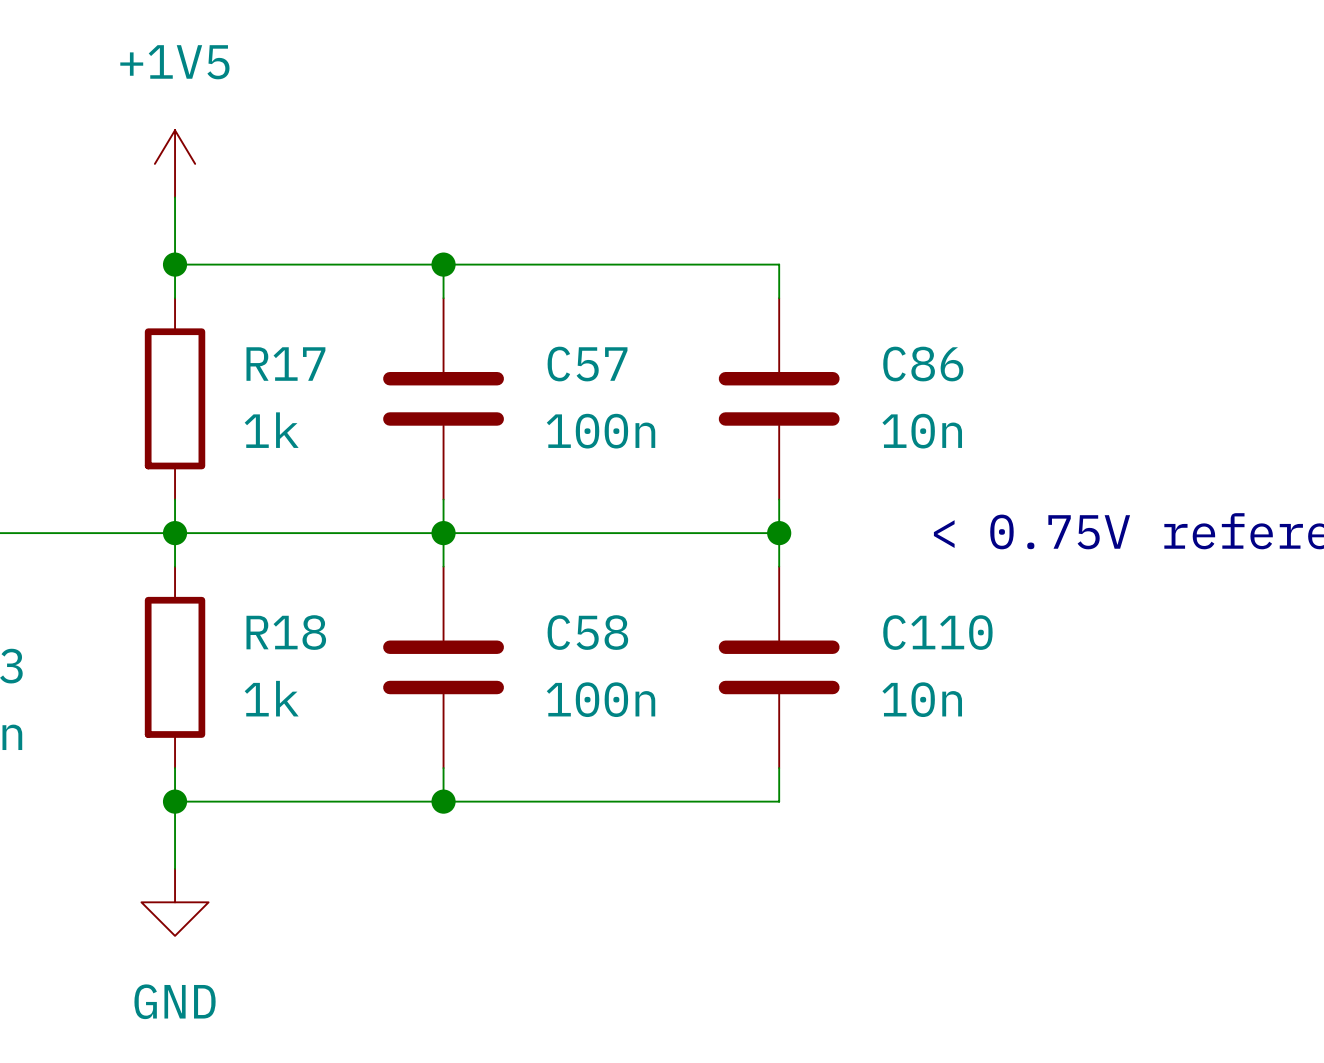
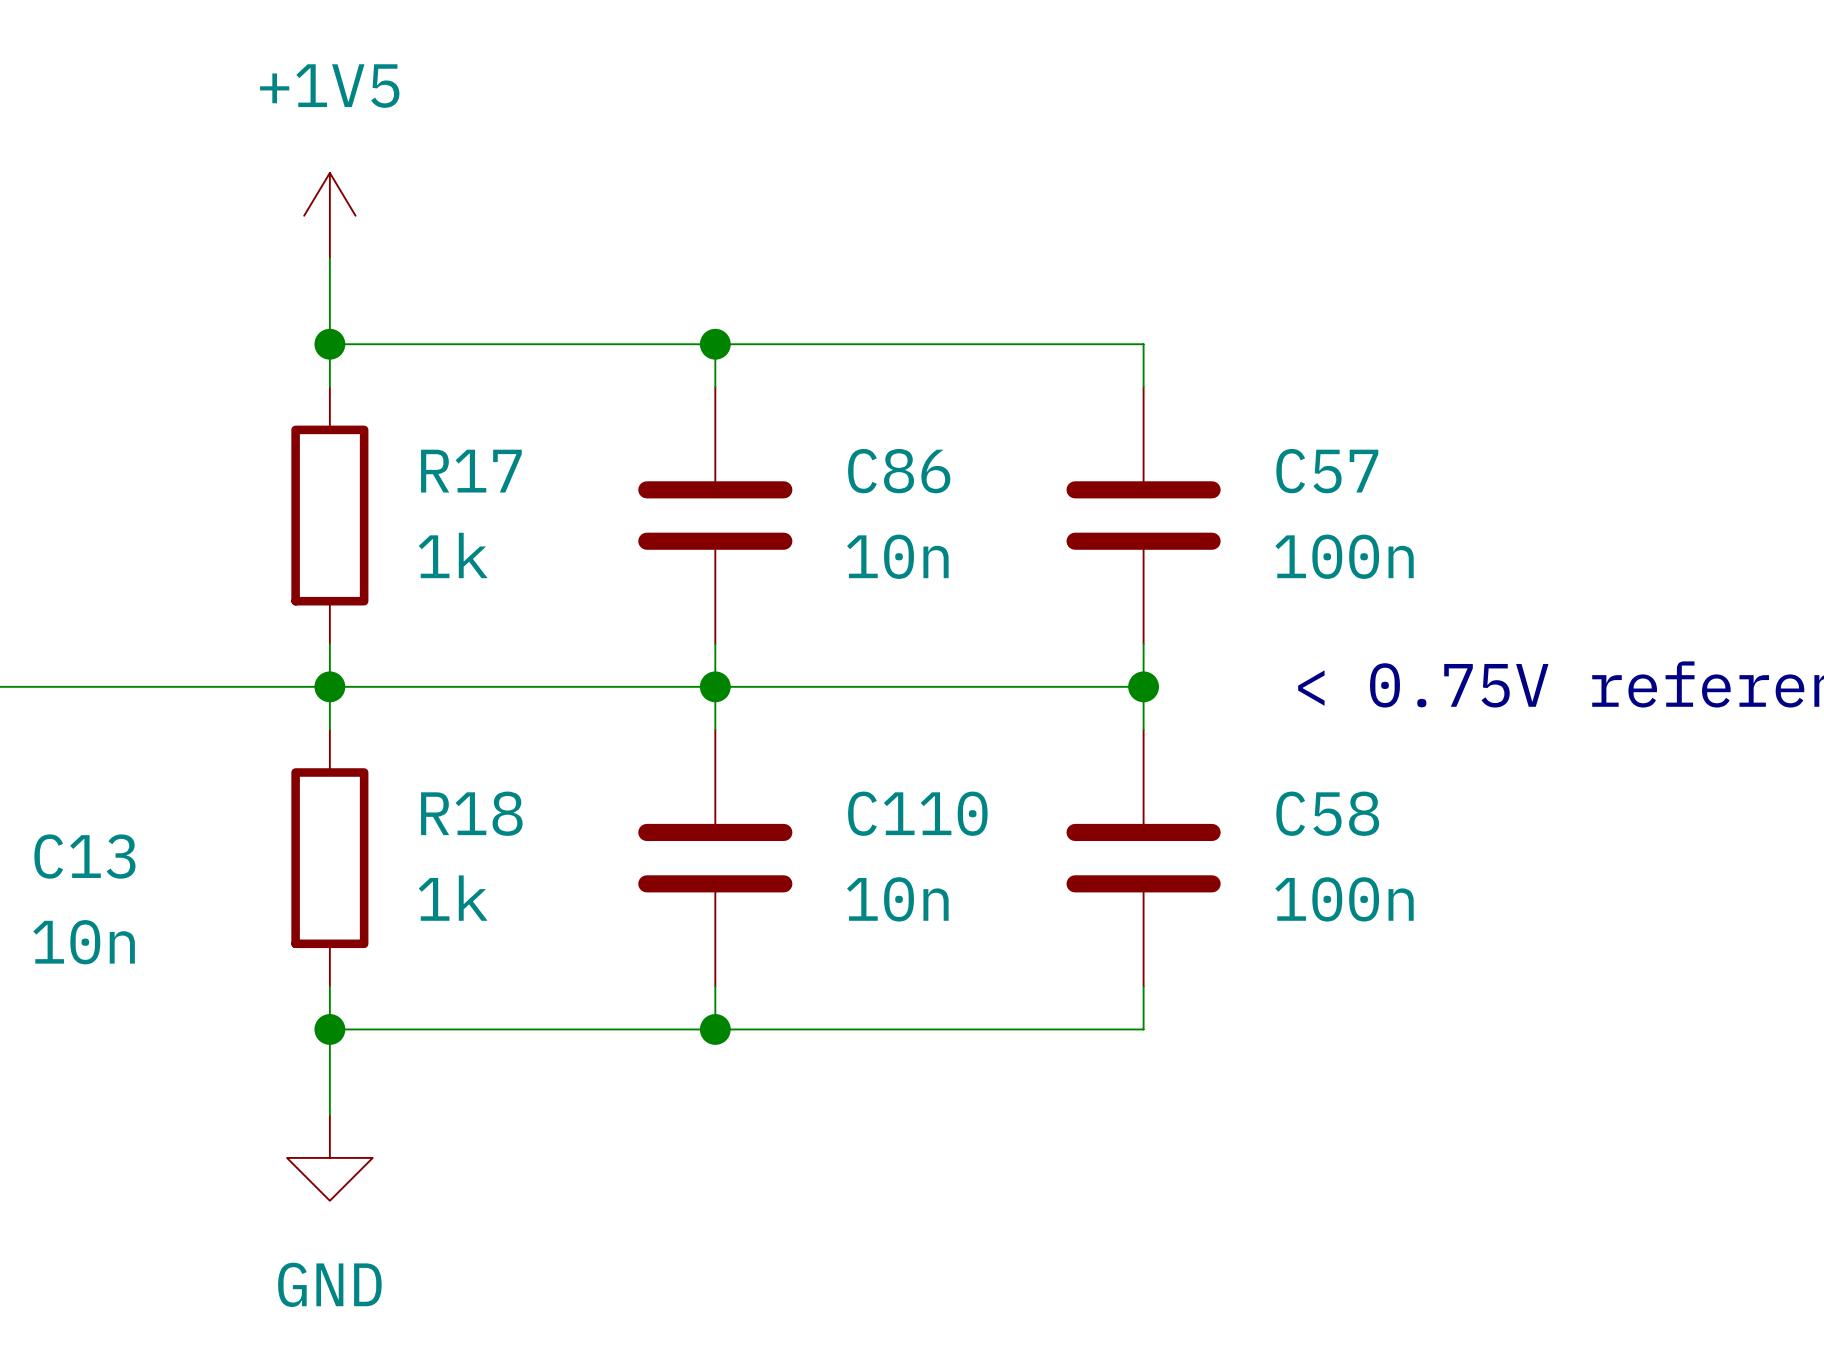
wire: (443, 264) (443, 298) -> (715, 344) (715, 387)
junction position: (443, 264) -> (715, 344)
wire: (779, 264) (779, 298) -> (1100, 344) (1143, 344) (1143, 387)
C57 position: (443, 398) -> (1143, 515)
C86 position: (779, 398) -> (715, 515)
wire: (443, 499) (443, 566) -> (715, 644) (715, 729)
wire: (779, 499) (779, 566) -> (1143, 644) (1143, 729)
junction position: (443, 533) -> (715, 686)
wire: none -> (1100, 686) (1143, 686)
junction position: (779, 533) -> (1143, 686)
C58 position: (443, 667) -> (1143, 858)
C110 position: (779, 667) -> (715, 858)
wire: (443, 768) (443, 801) -> (715, 986) (715, 1029)
wire: (779, 768) (779, 801) -> (1143, 986) (1143, 1029) (1100, 1029)
junction position: (443, 801) -> (715, 1029)

